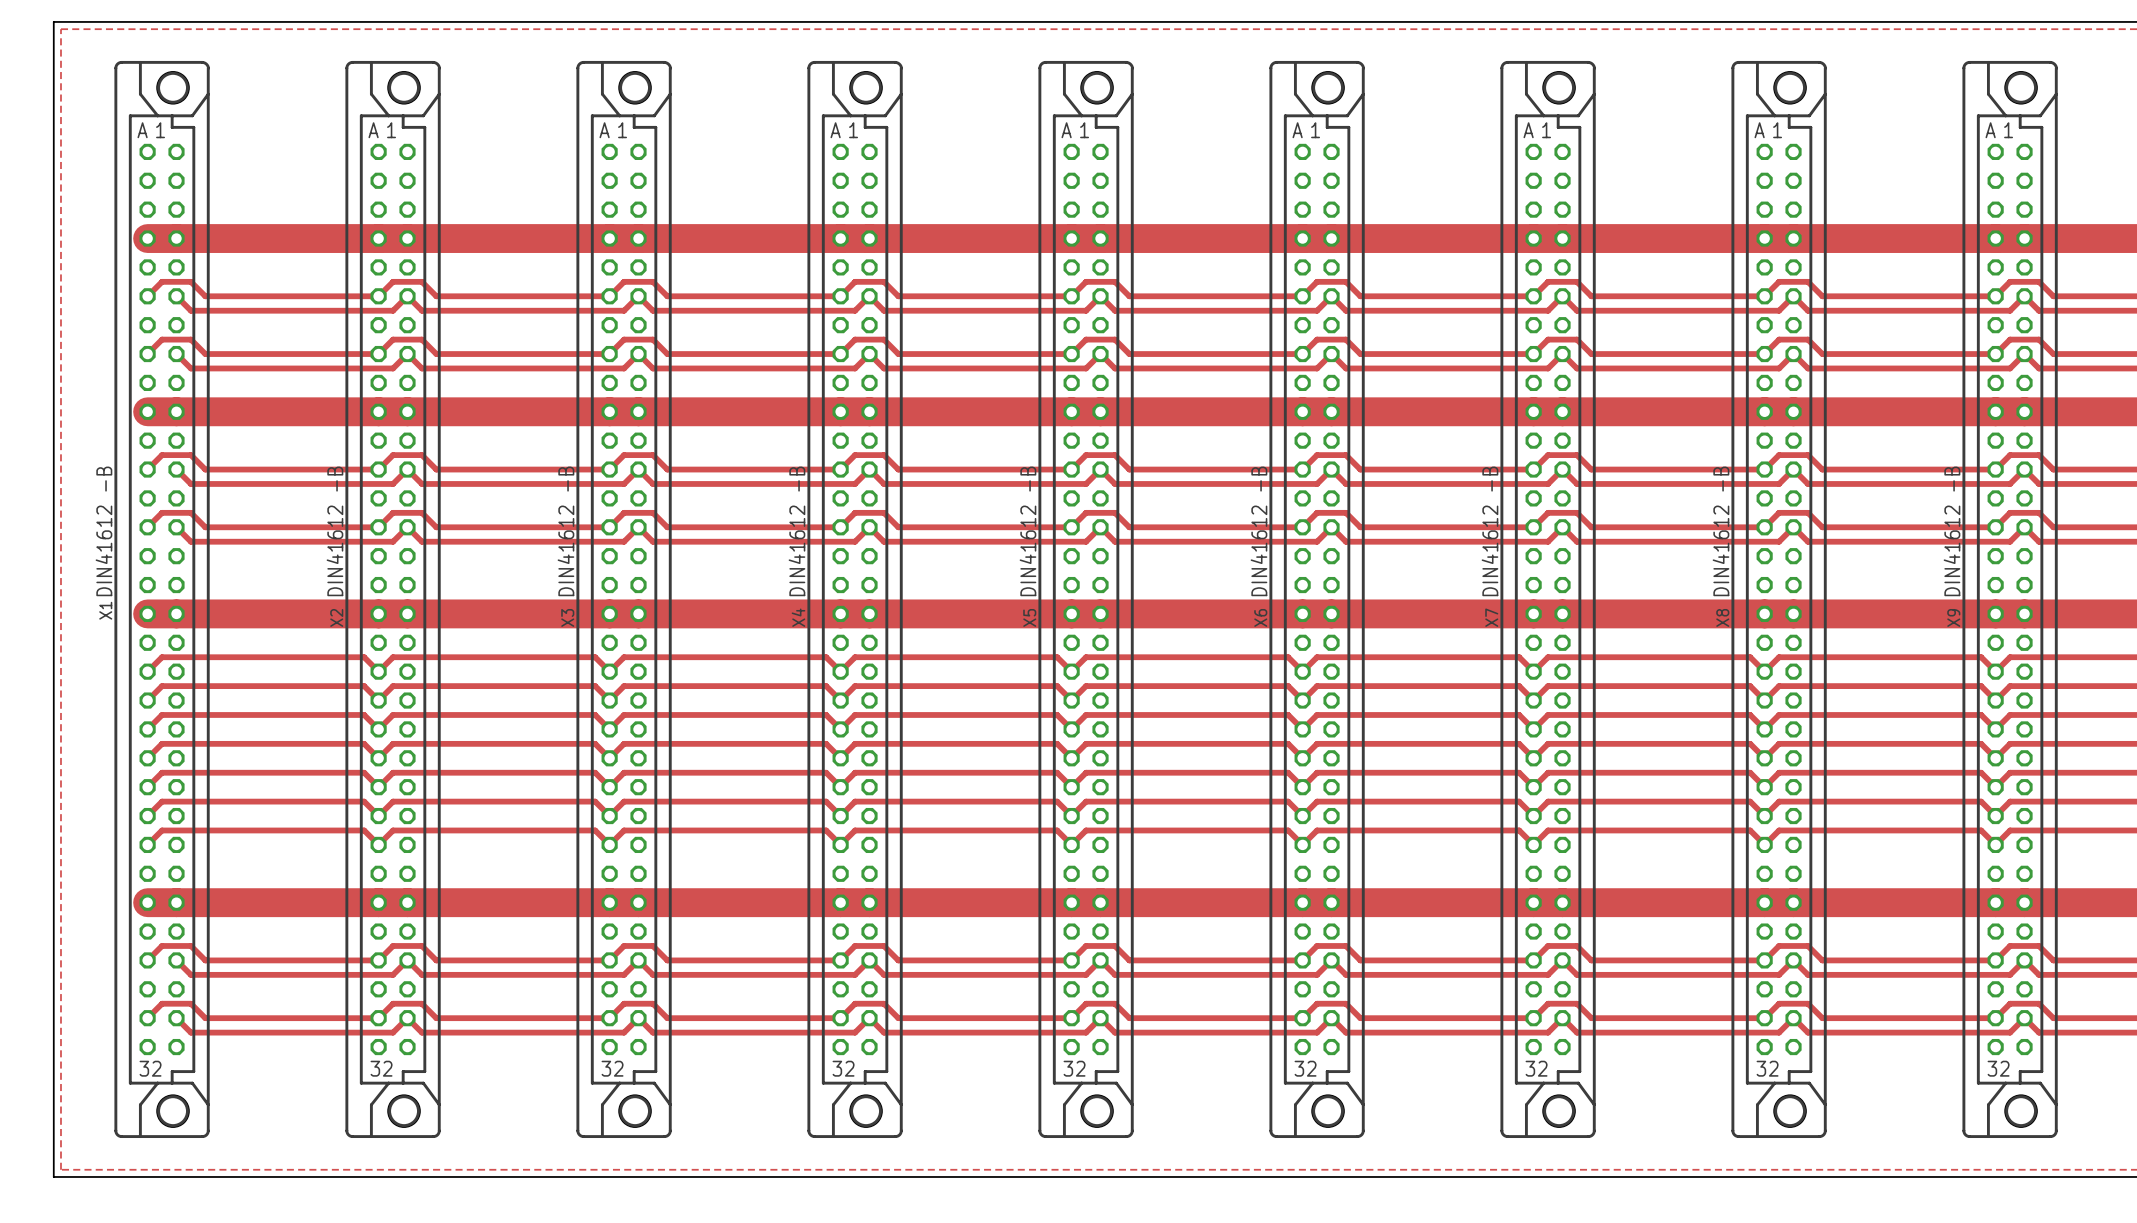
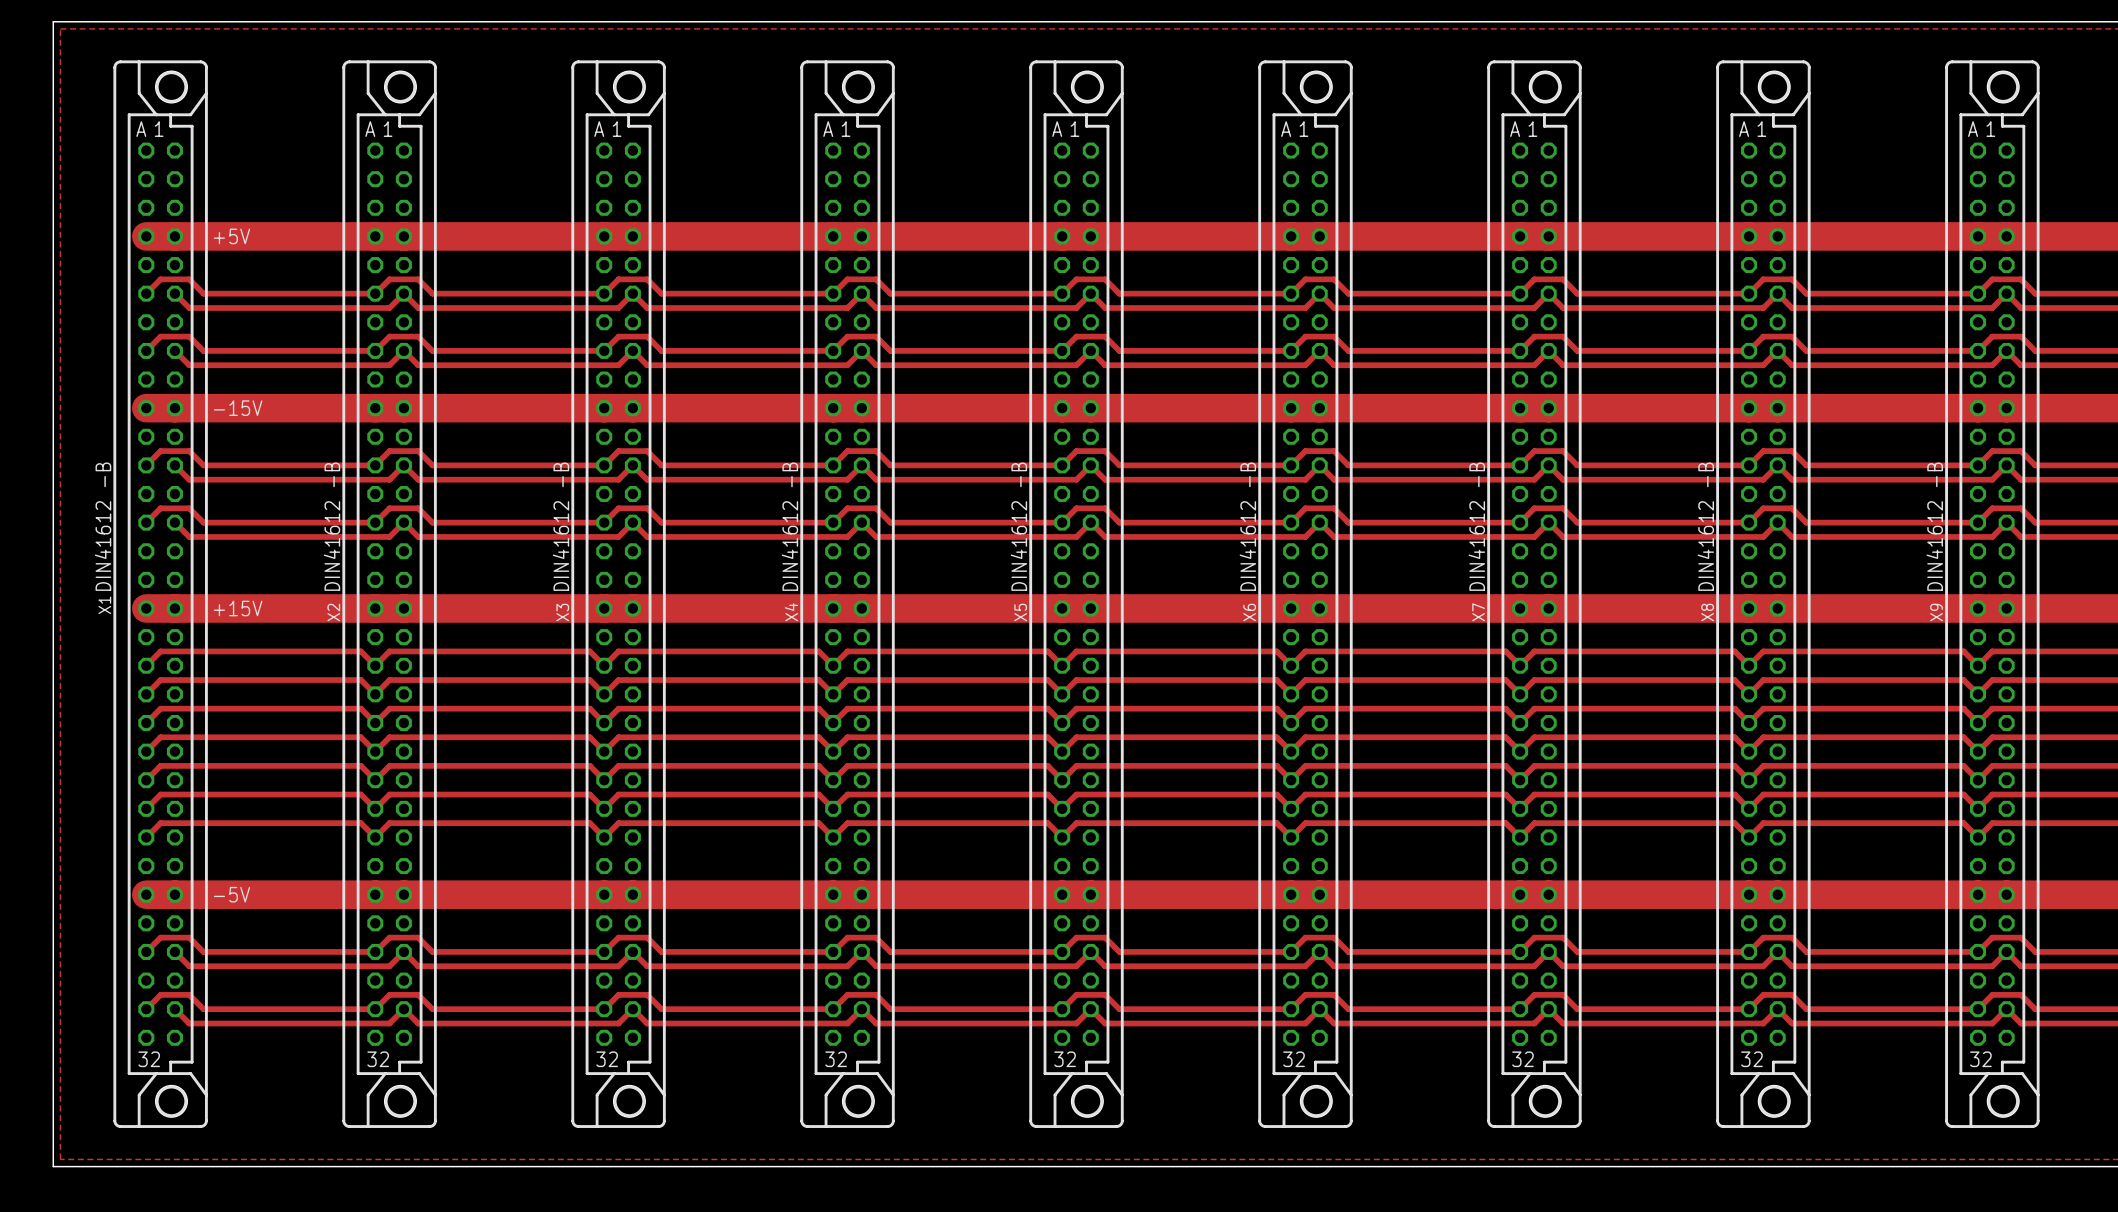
text: none -> +5V (232, 236)
text: none -> -15V (238, 408)
text: none -> +15V (238, 608)
text: none -> -5V (232, 894)

